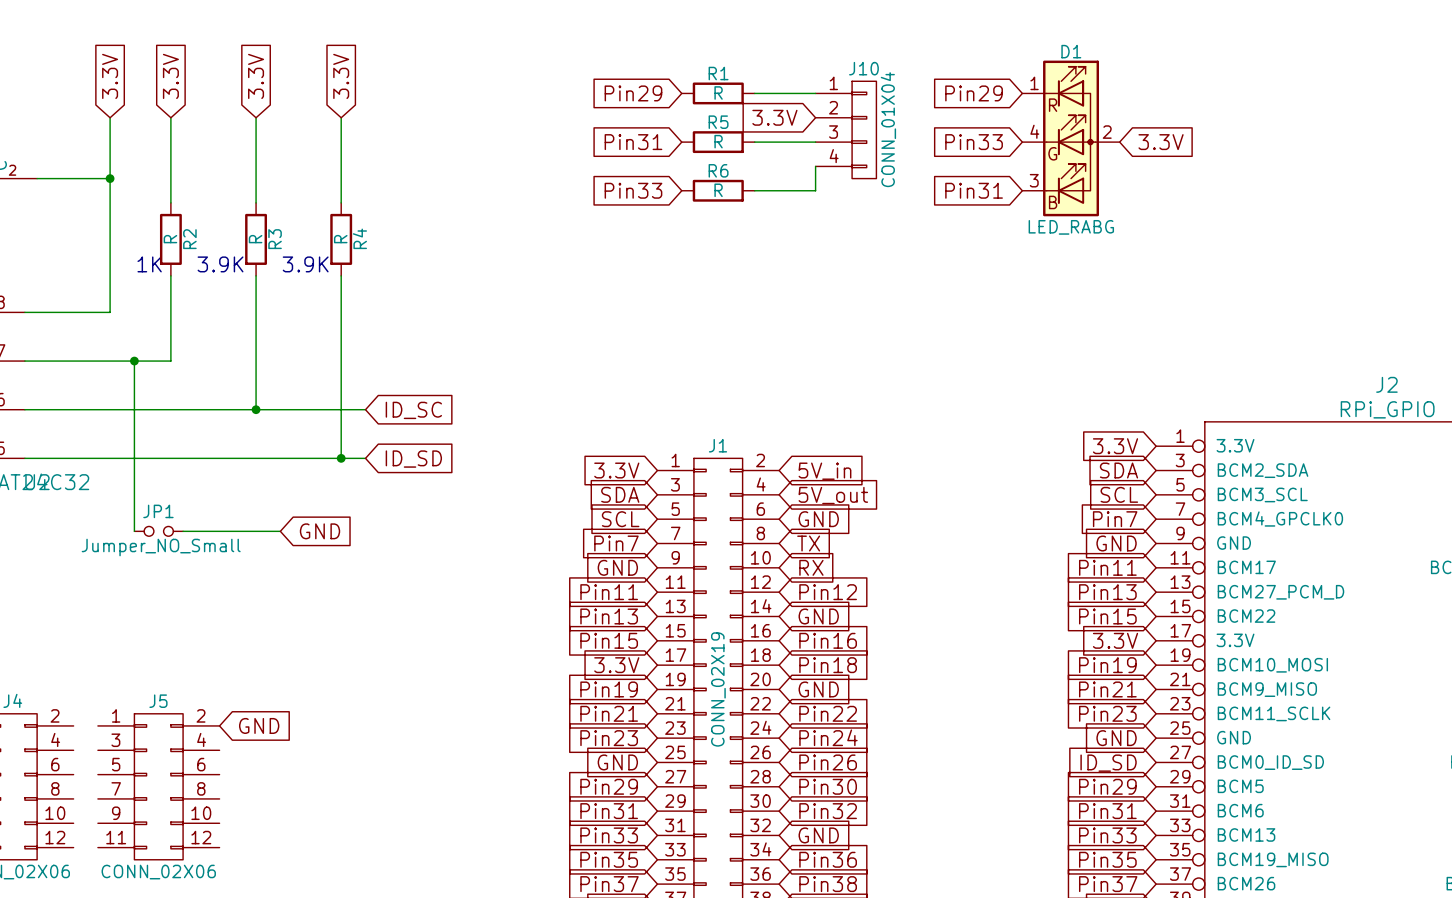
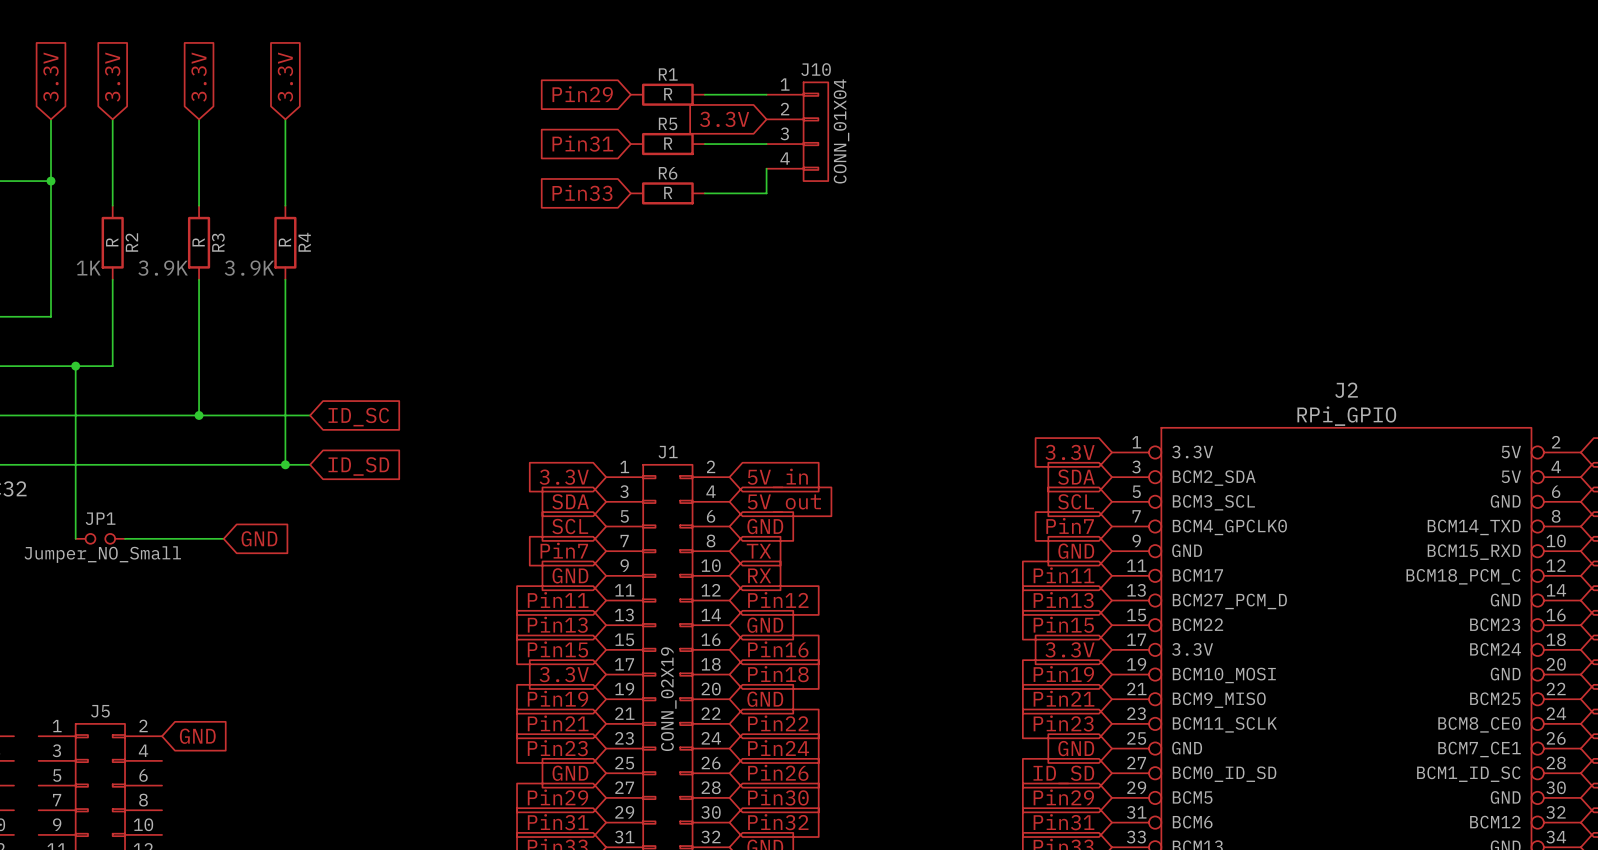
global label: Pin29 (974, 93) -> none
D1: LED_RABG (1071, 138) -> none
global label: Pin33 (974, 142) -> none
global label: 3.3V (1161, 142) -> none
global label: Pin31 (974, 190) -> none

